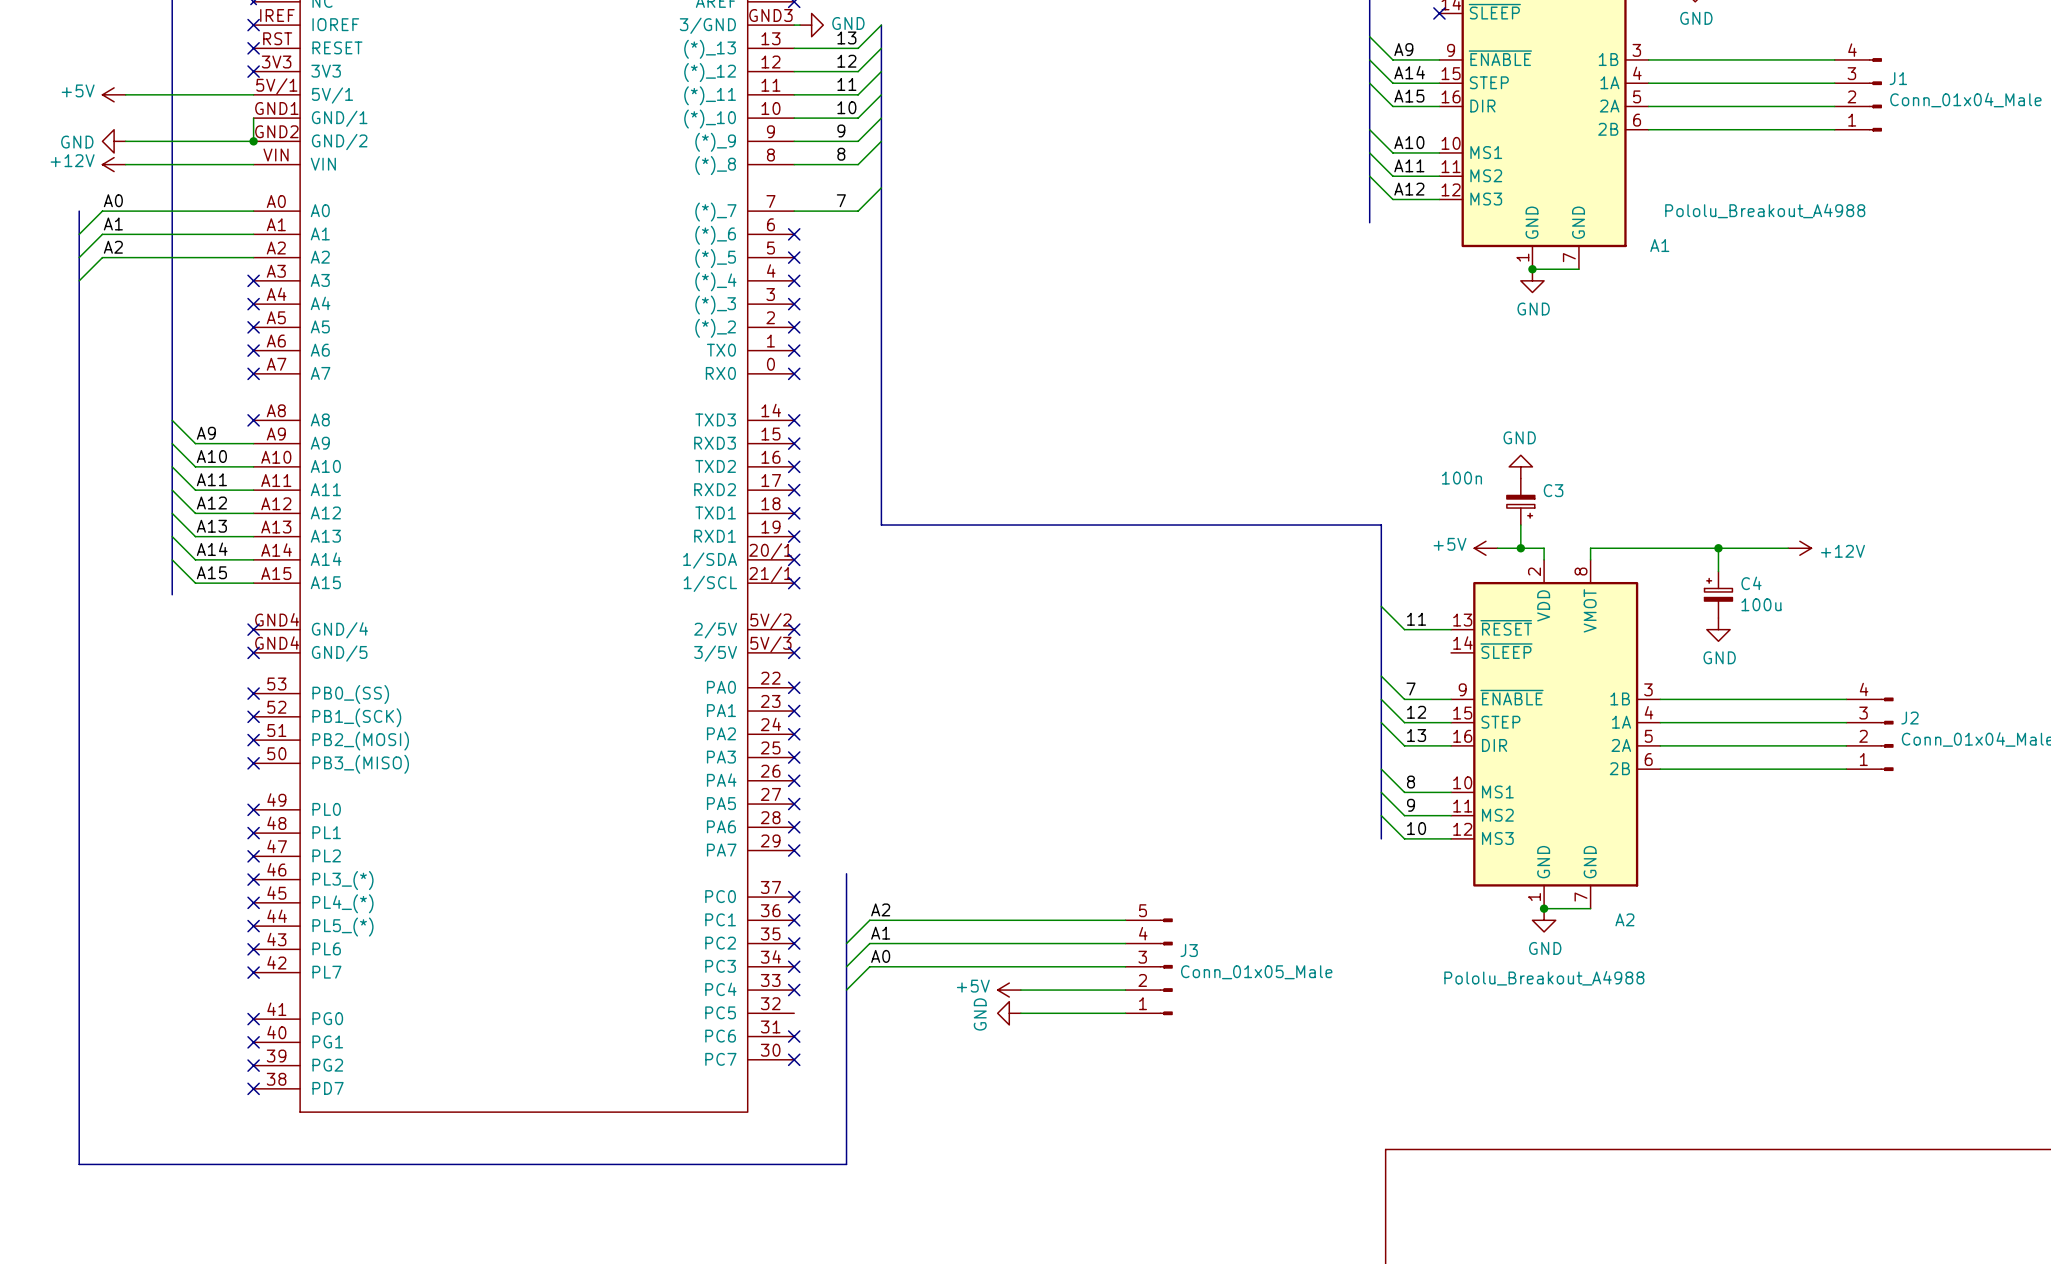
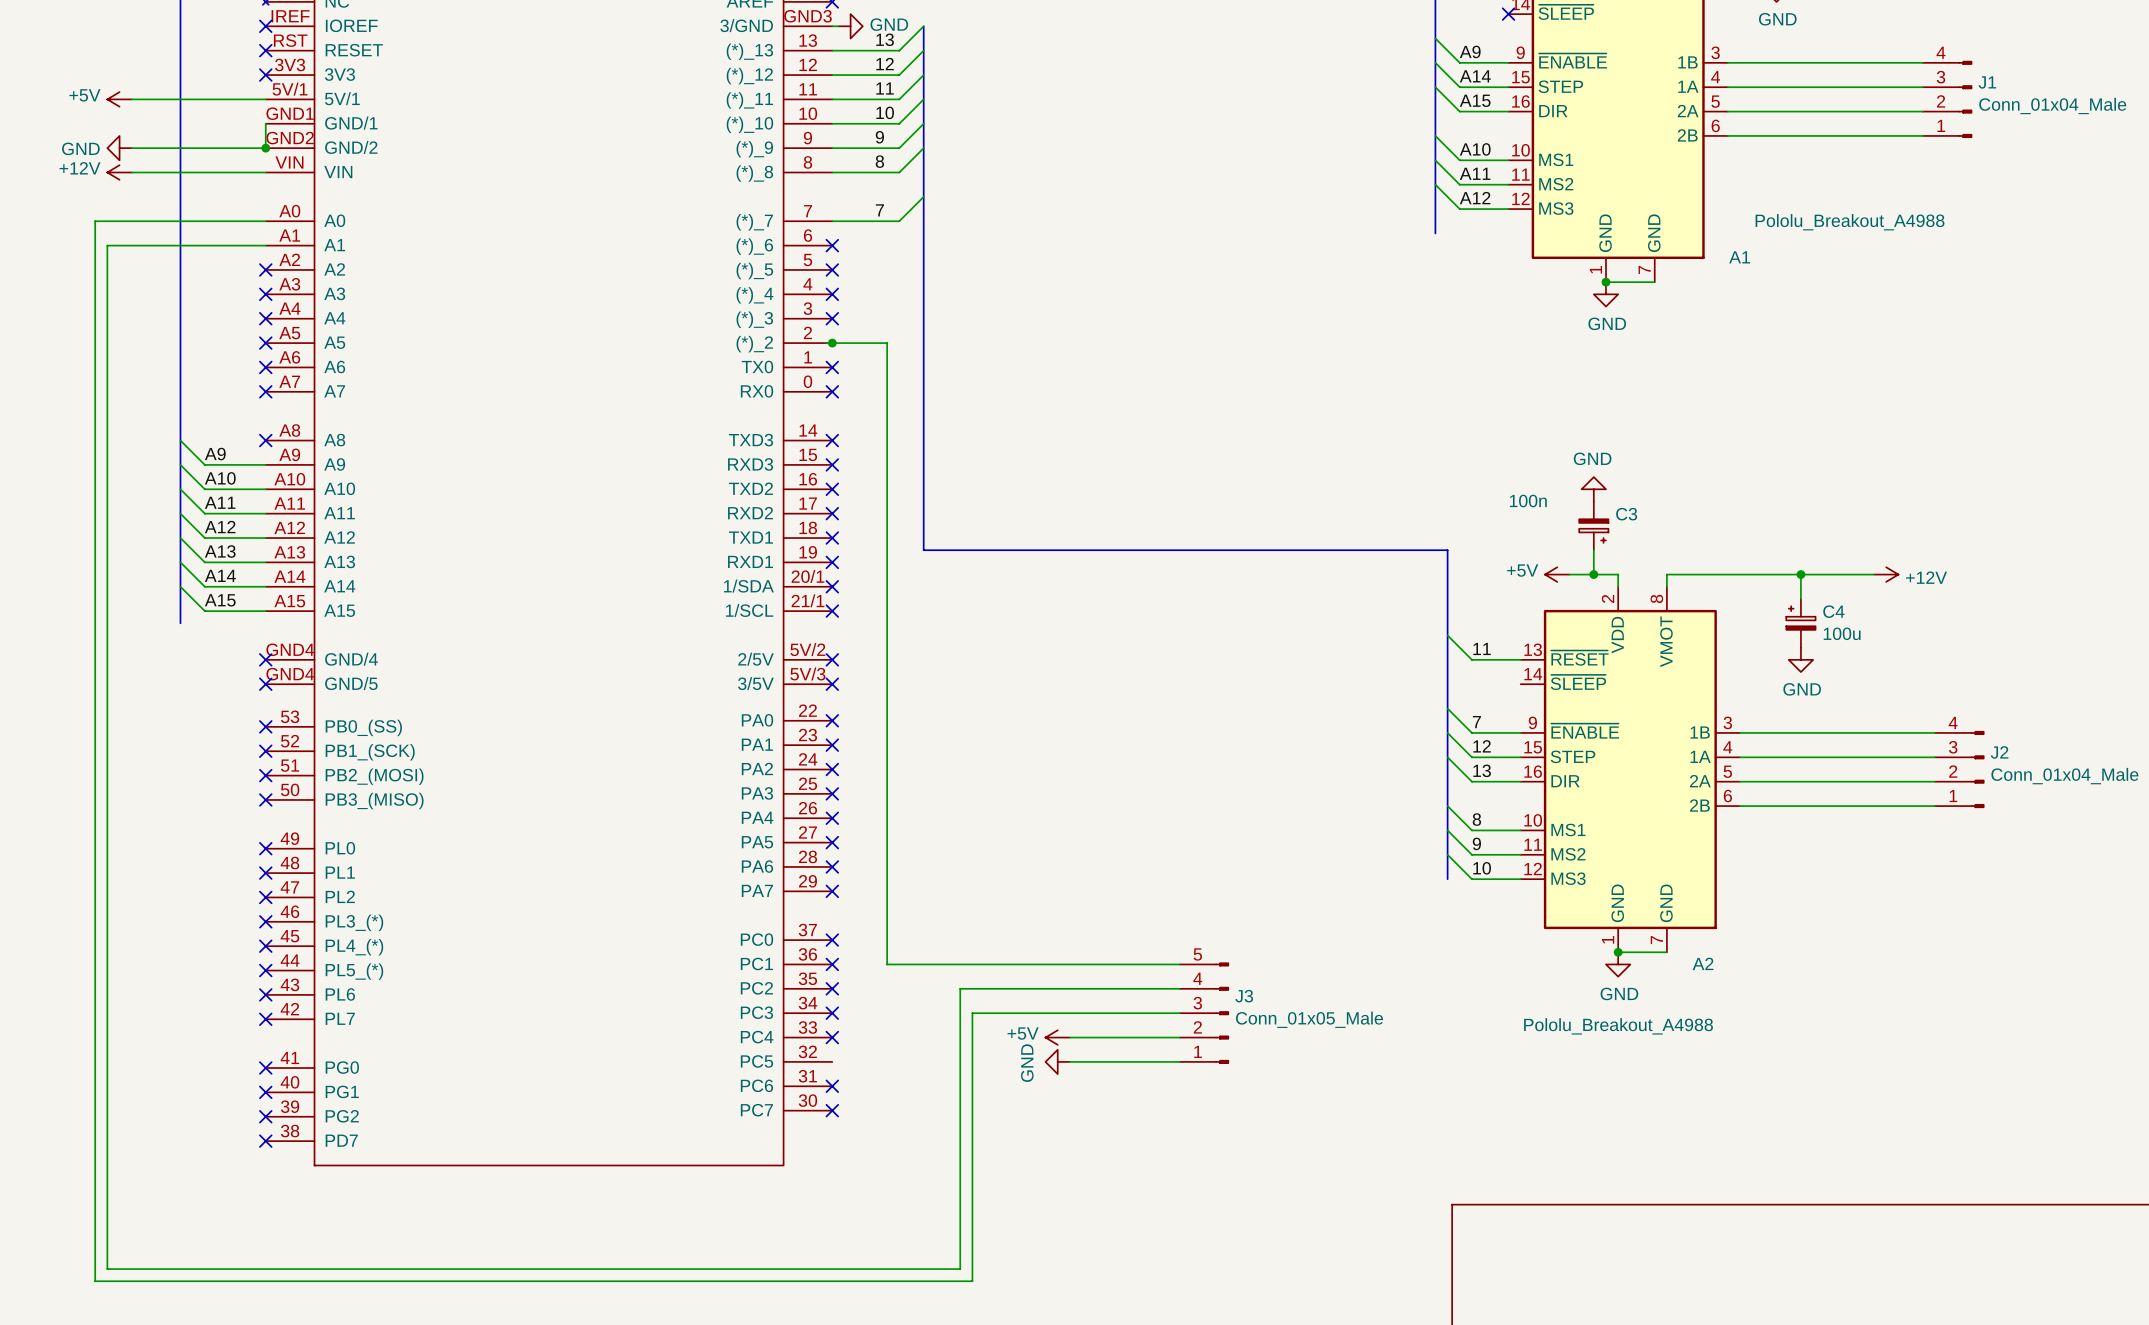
label: A0 (113, 200) -> none
bus: (79, 211) (79, 1164) (846, 1164) (846, 873) -> none
wire: (102, 211) (79, 234) -> none
label: A1 (113, 223) -> none
wire: (102, 234) (79, 257) -> none
label: A2 (113, 247) -> none
wire: (253, 257) (102, 257) (79, 280) -> none
no-connect mark: none -> (265, 269)
no-connect mark: (794, 327) -> none
junction: none -> (832, 343)
label: A2 (880, 909) -> none
wire: (869, 920) (846, 943) -> (911, 964) (887, 964) (887, 343) (826, 343)
label: A1 (880, 933) -> none
wire: (916, 943) (869, 943) (846, 966) -> (960, 988) (960, 1269) (107, 1269) (107, 245)
label: A0 (880, 956) -> none
wire: (927, 966) (869, 966) (846, 990) -> (972, 1013) (972, 1281) (95, 1281) (95, 221) (107, 221)

